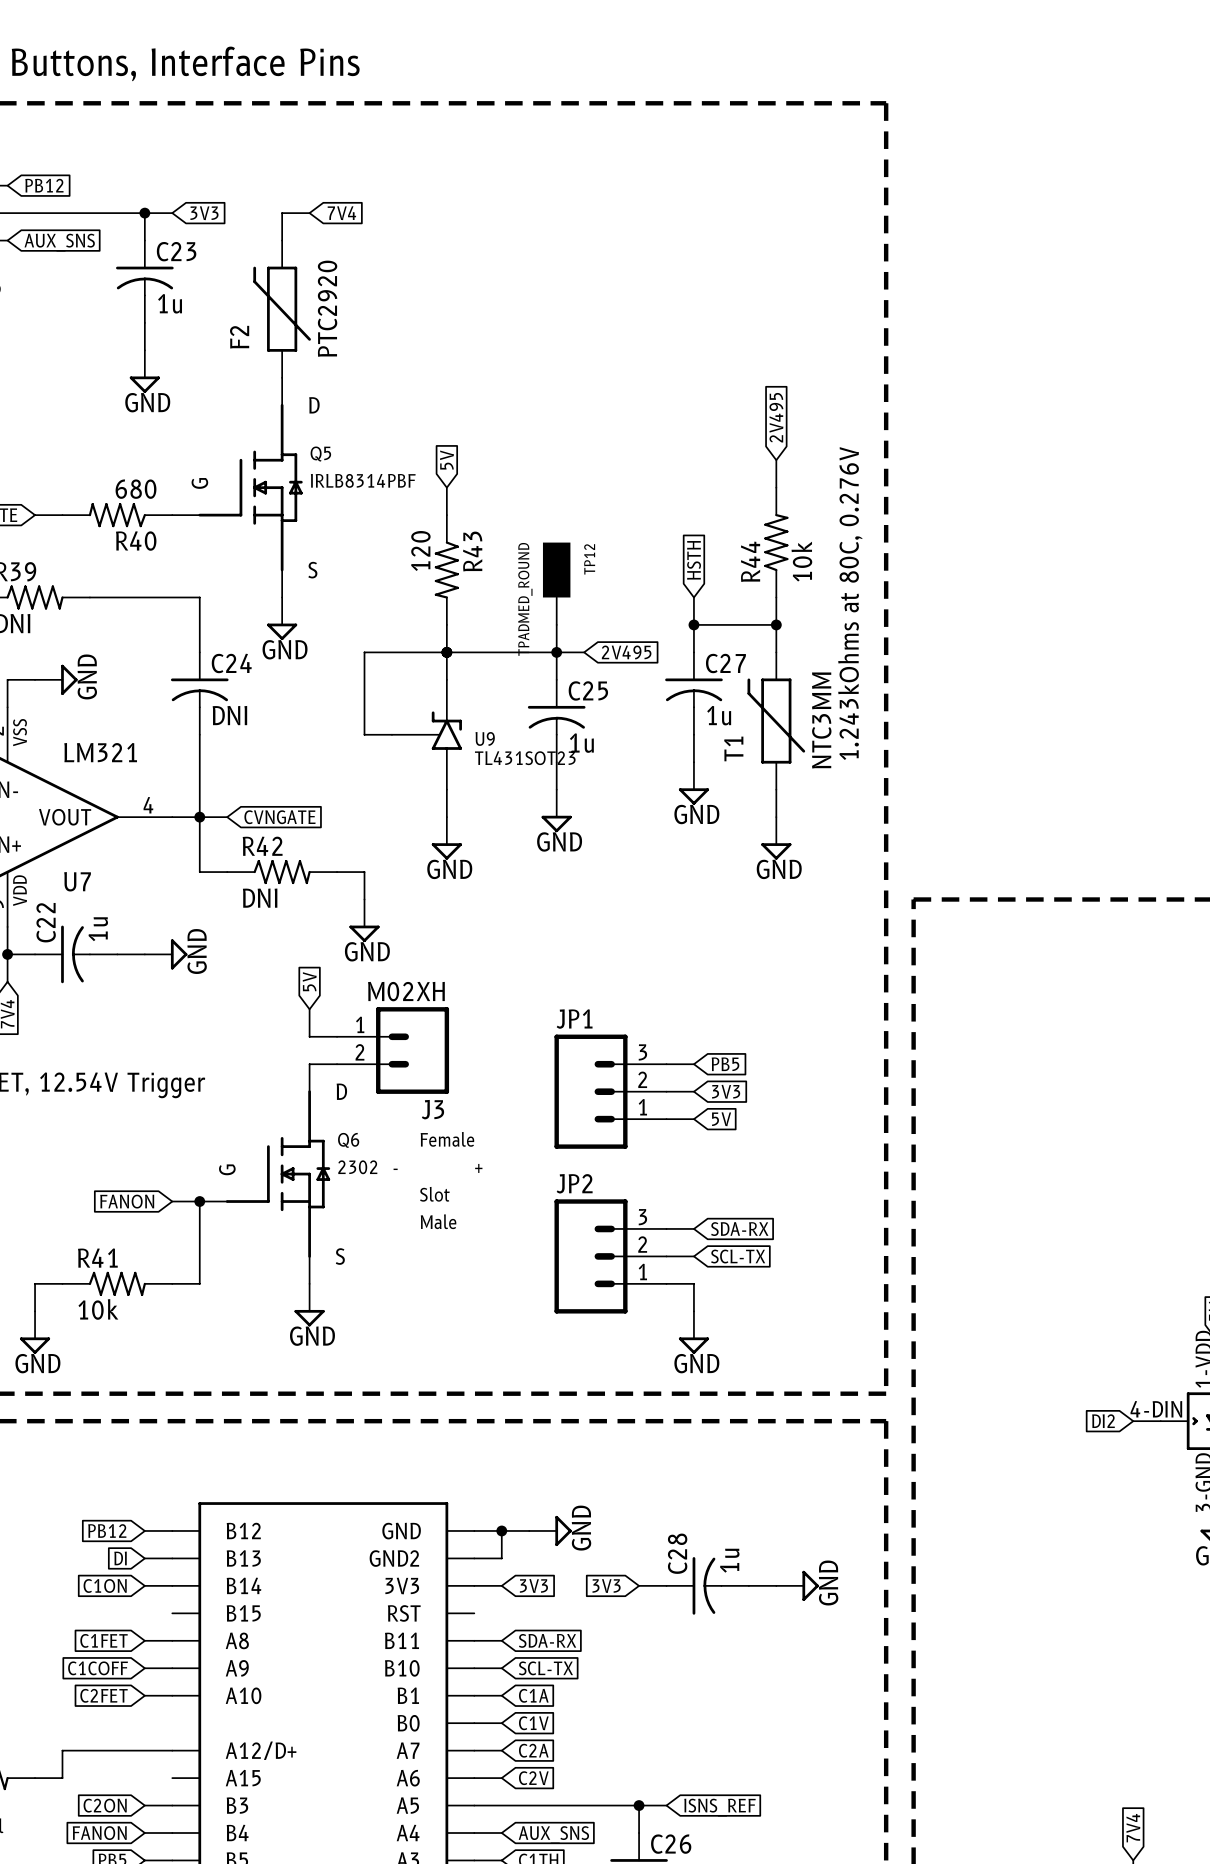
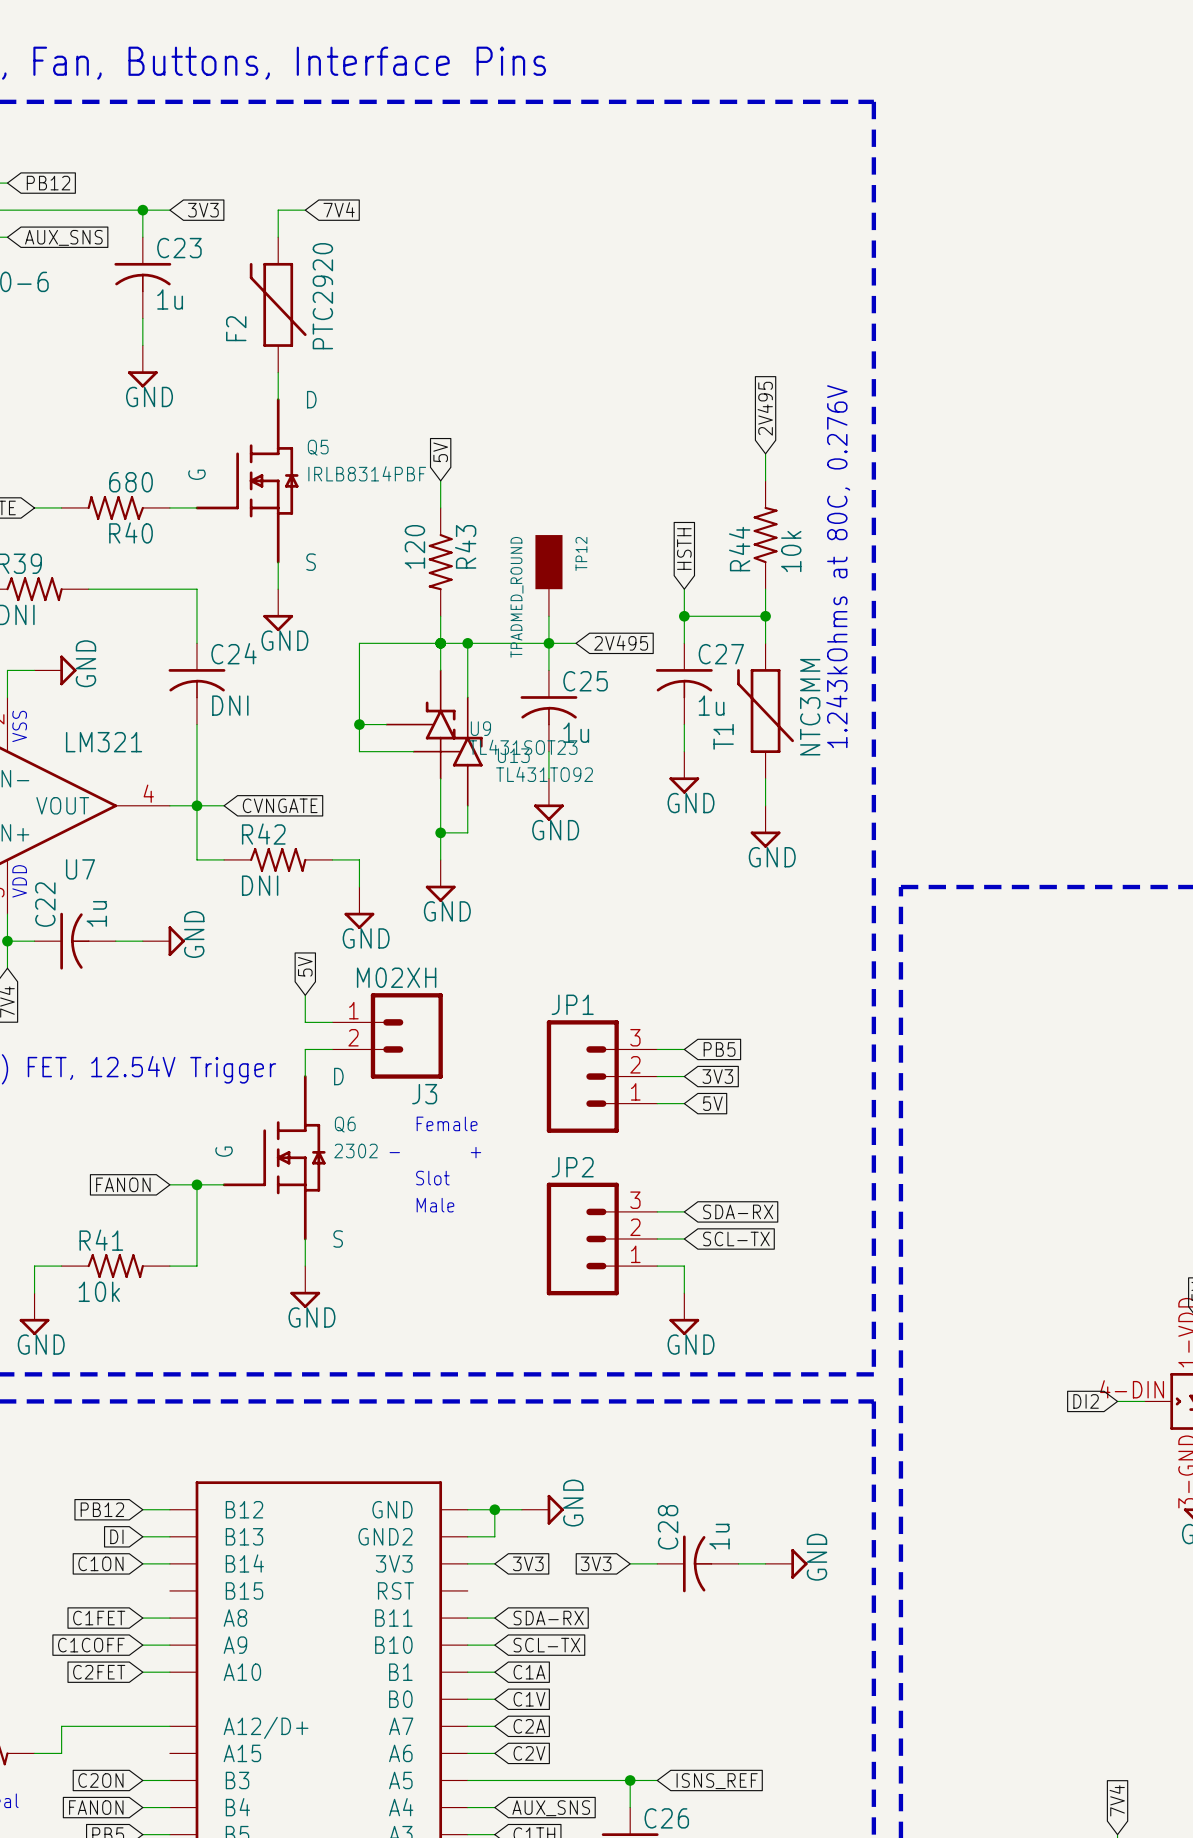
wire: none -> (467, 643) (467, 697)
junction: none -> (467, 643)
wire: none -> (359, 724) (359, 751) (413, 751)
junction: none -> (359, 724)
U13: none -> TL431TO92 (447, 751)
wire: none -> (467, 805) (467, 832) (440, 832)
power symbol position: GND (446, 838) -> GND (440, 880)
junction: none -> (440, 832)

